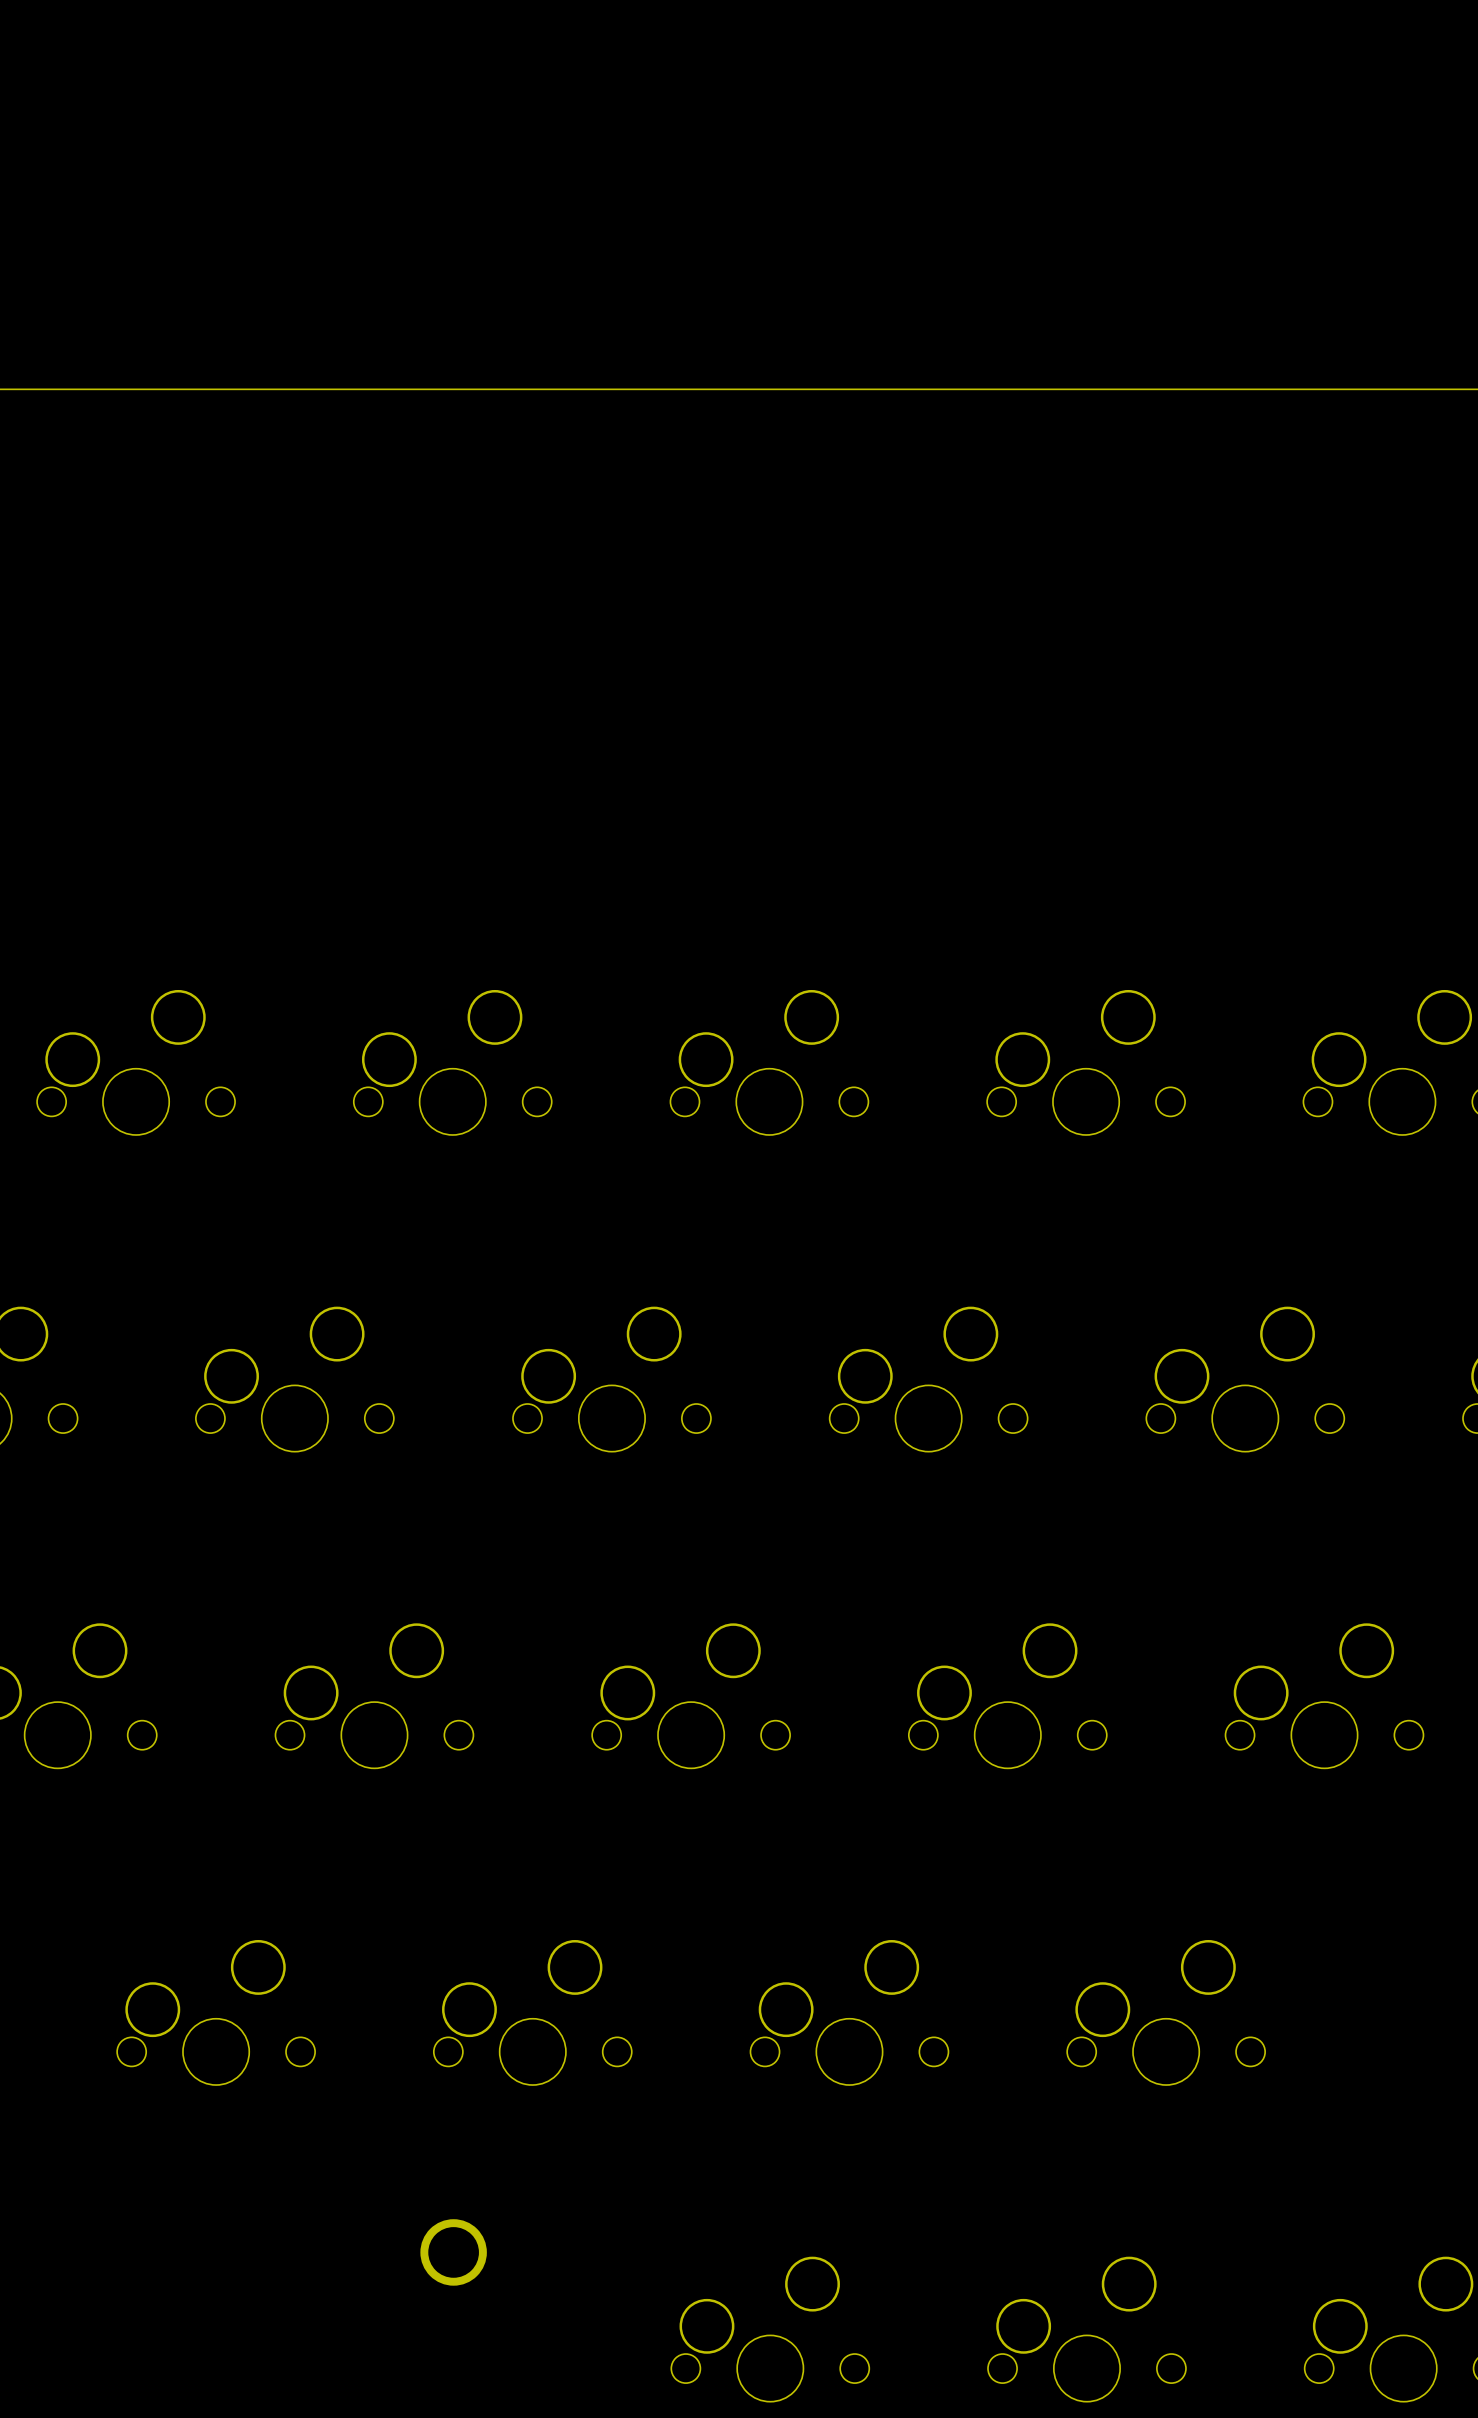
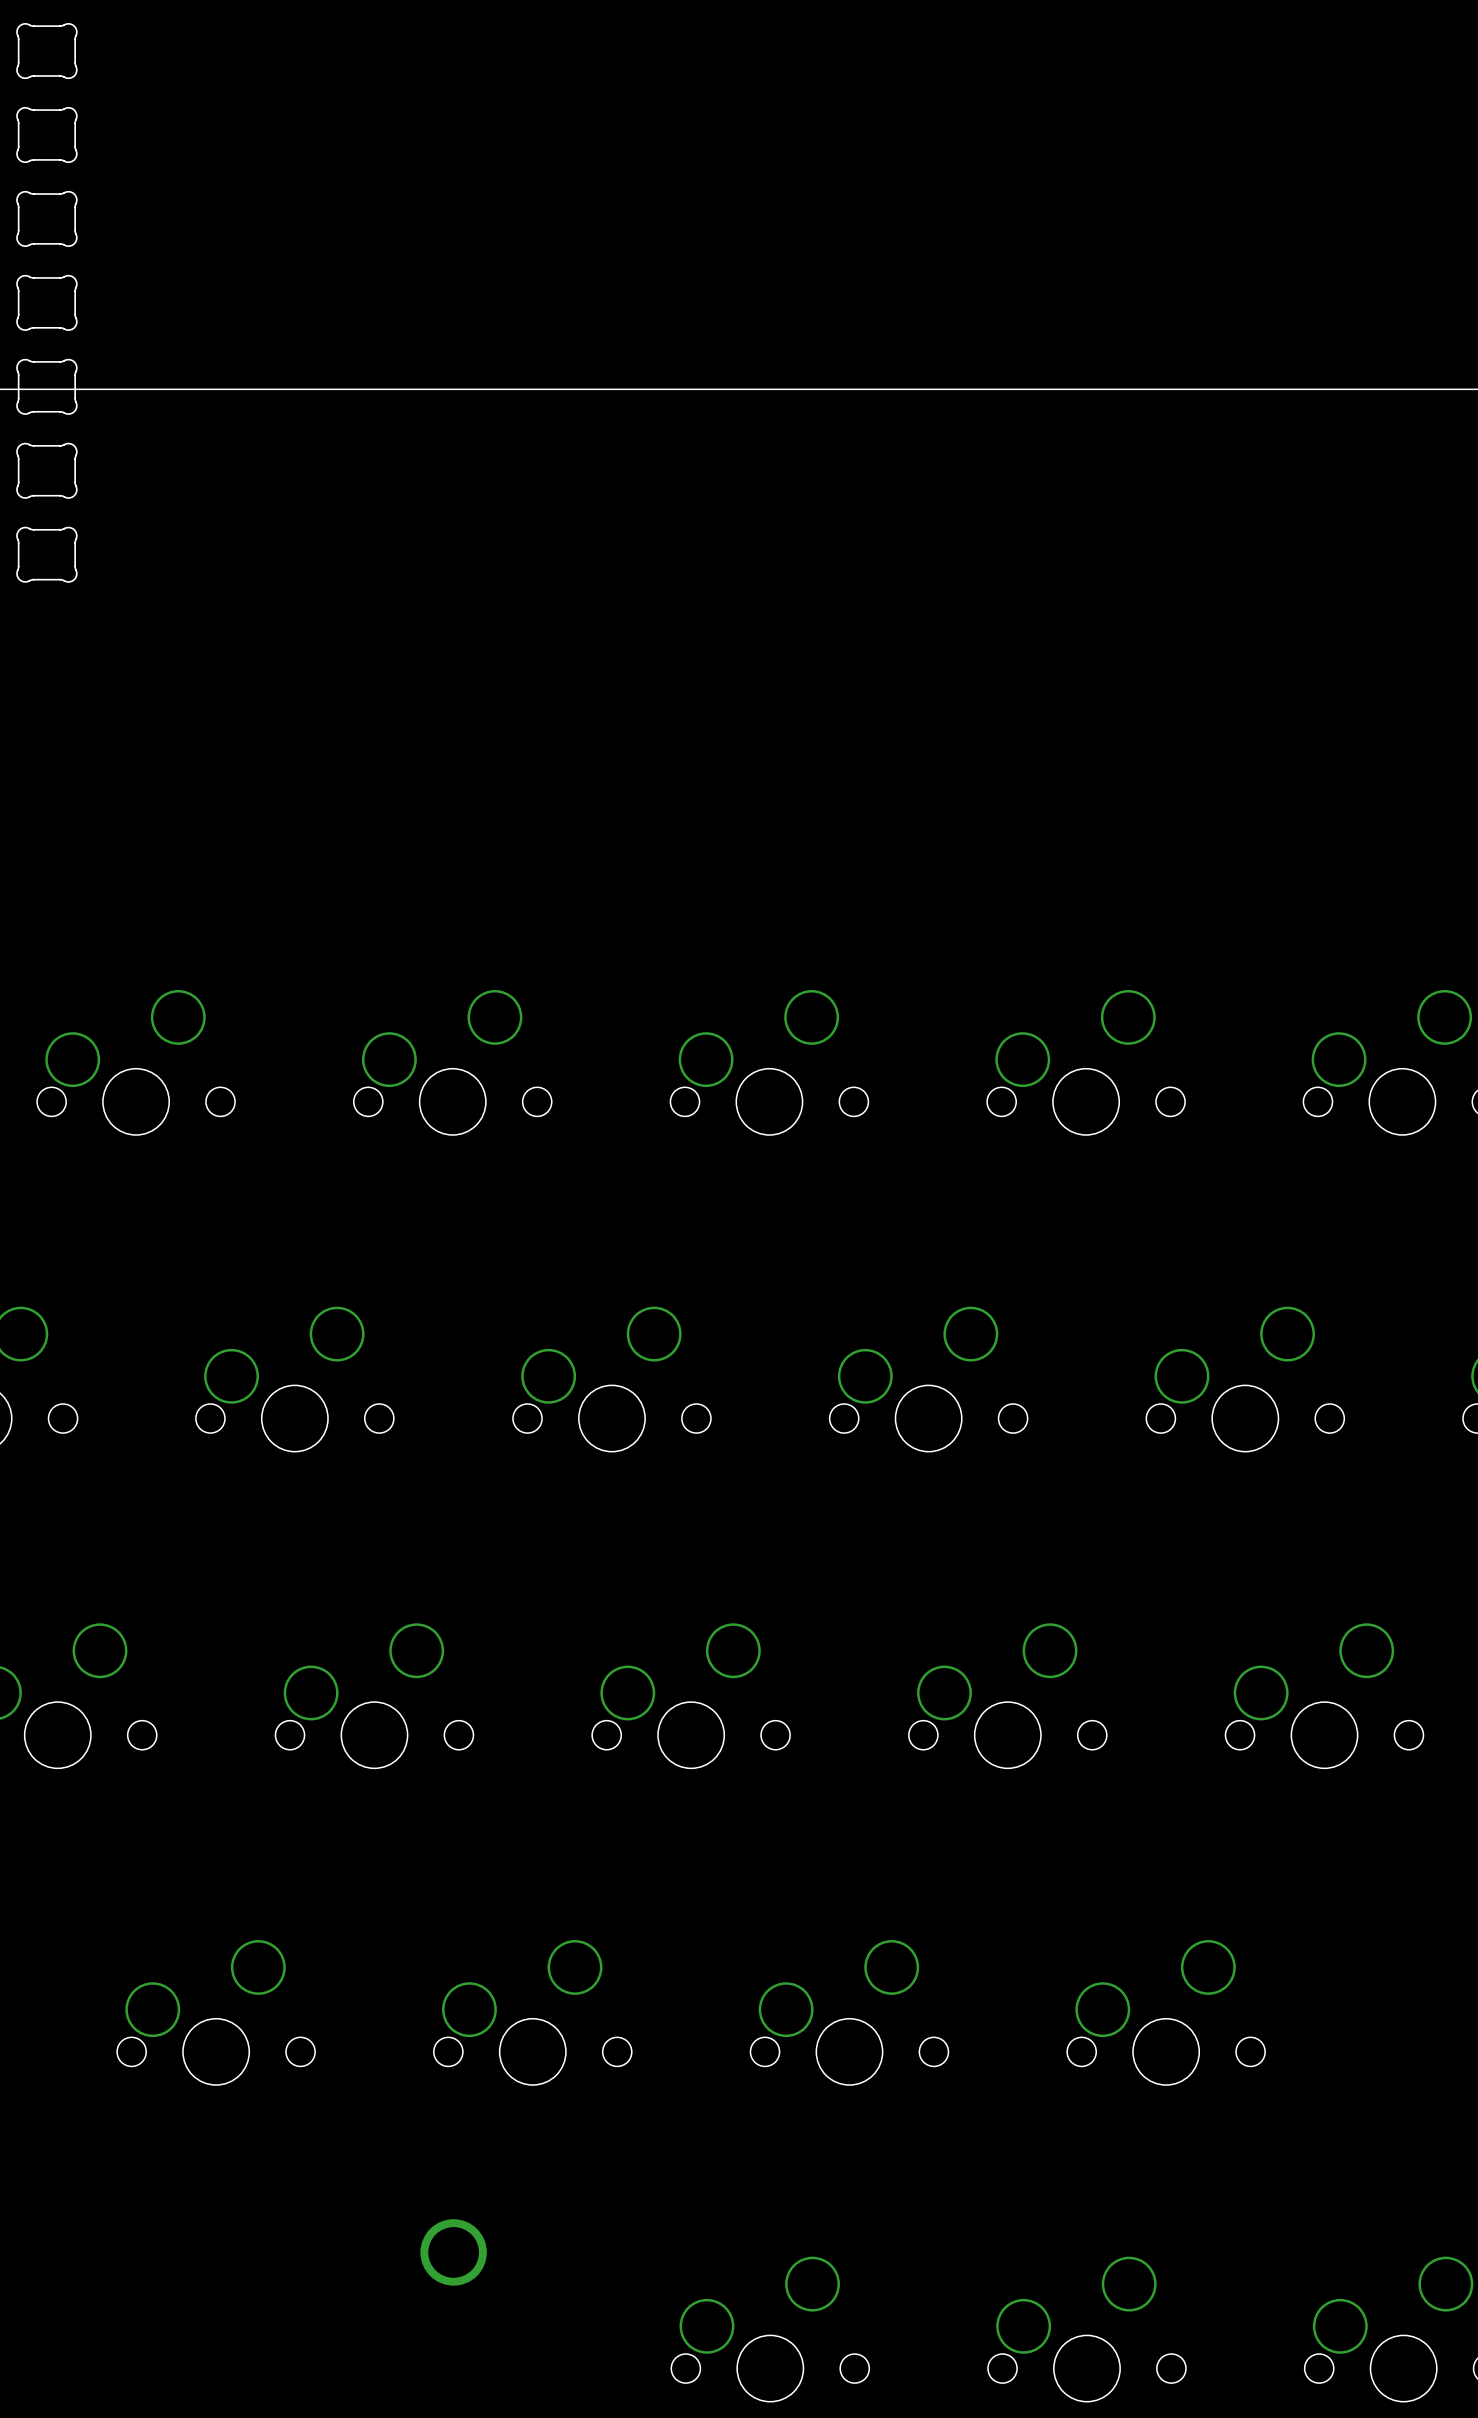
part: none -> (46, 51)
part: none -> (46, 135)
part: none -> (46, 218)
part: none -> (46, 302)
part: none -> (46, 386)
part: none -> (46, 470)
part: none -> (46, 554)

